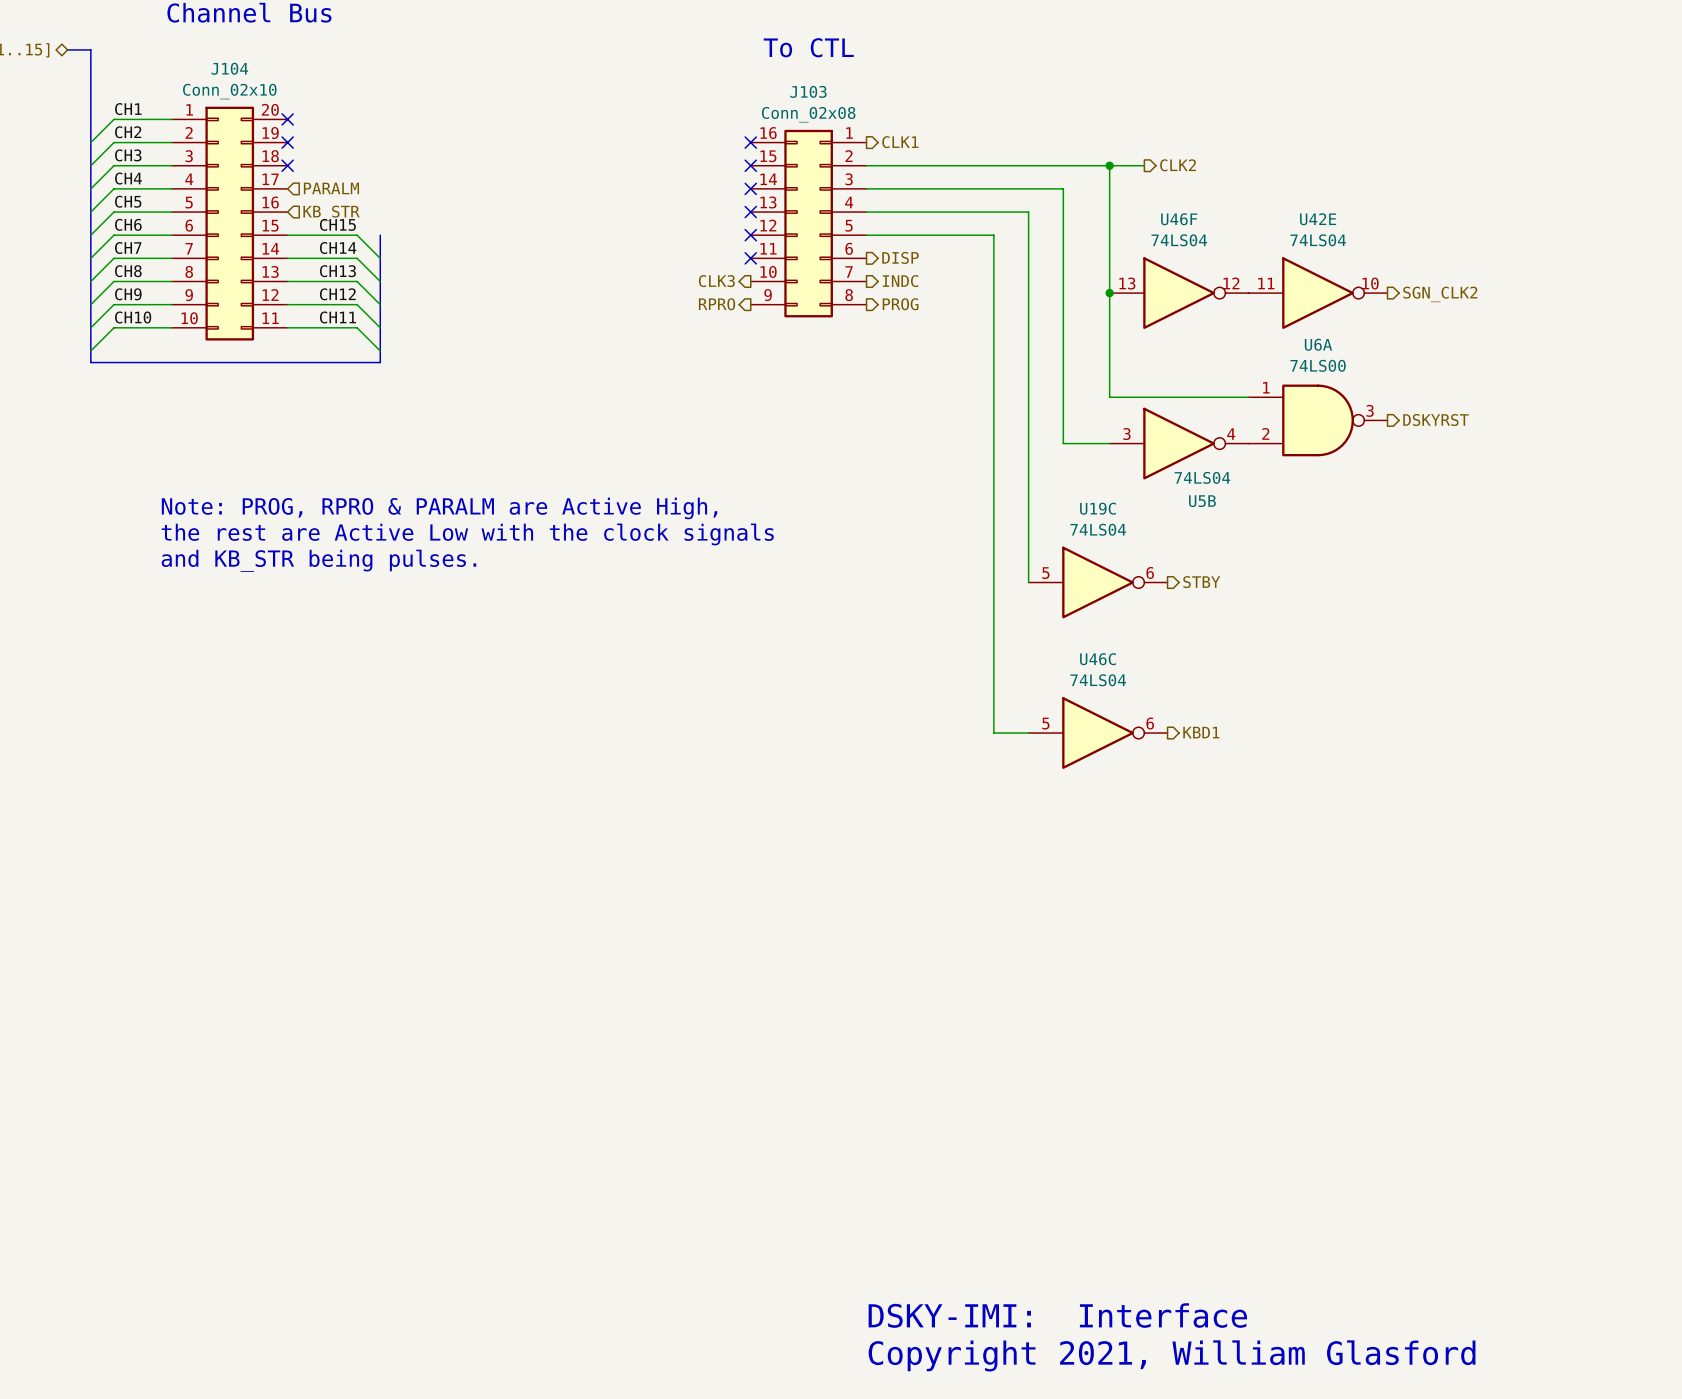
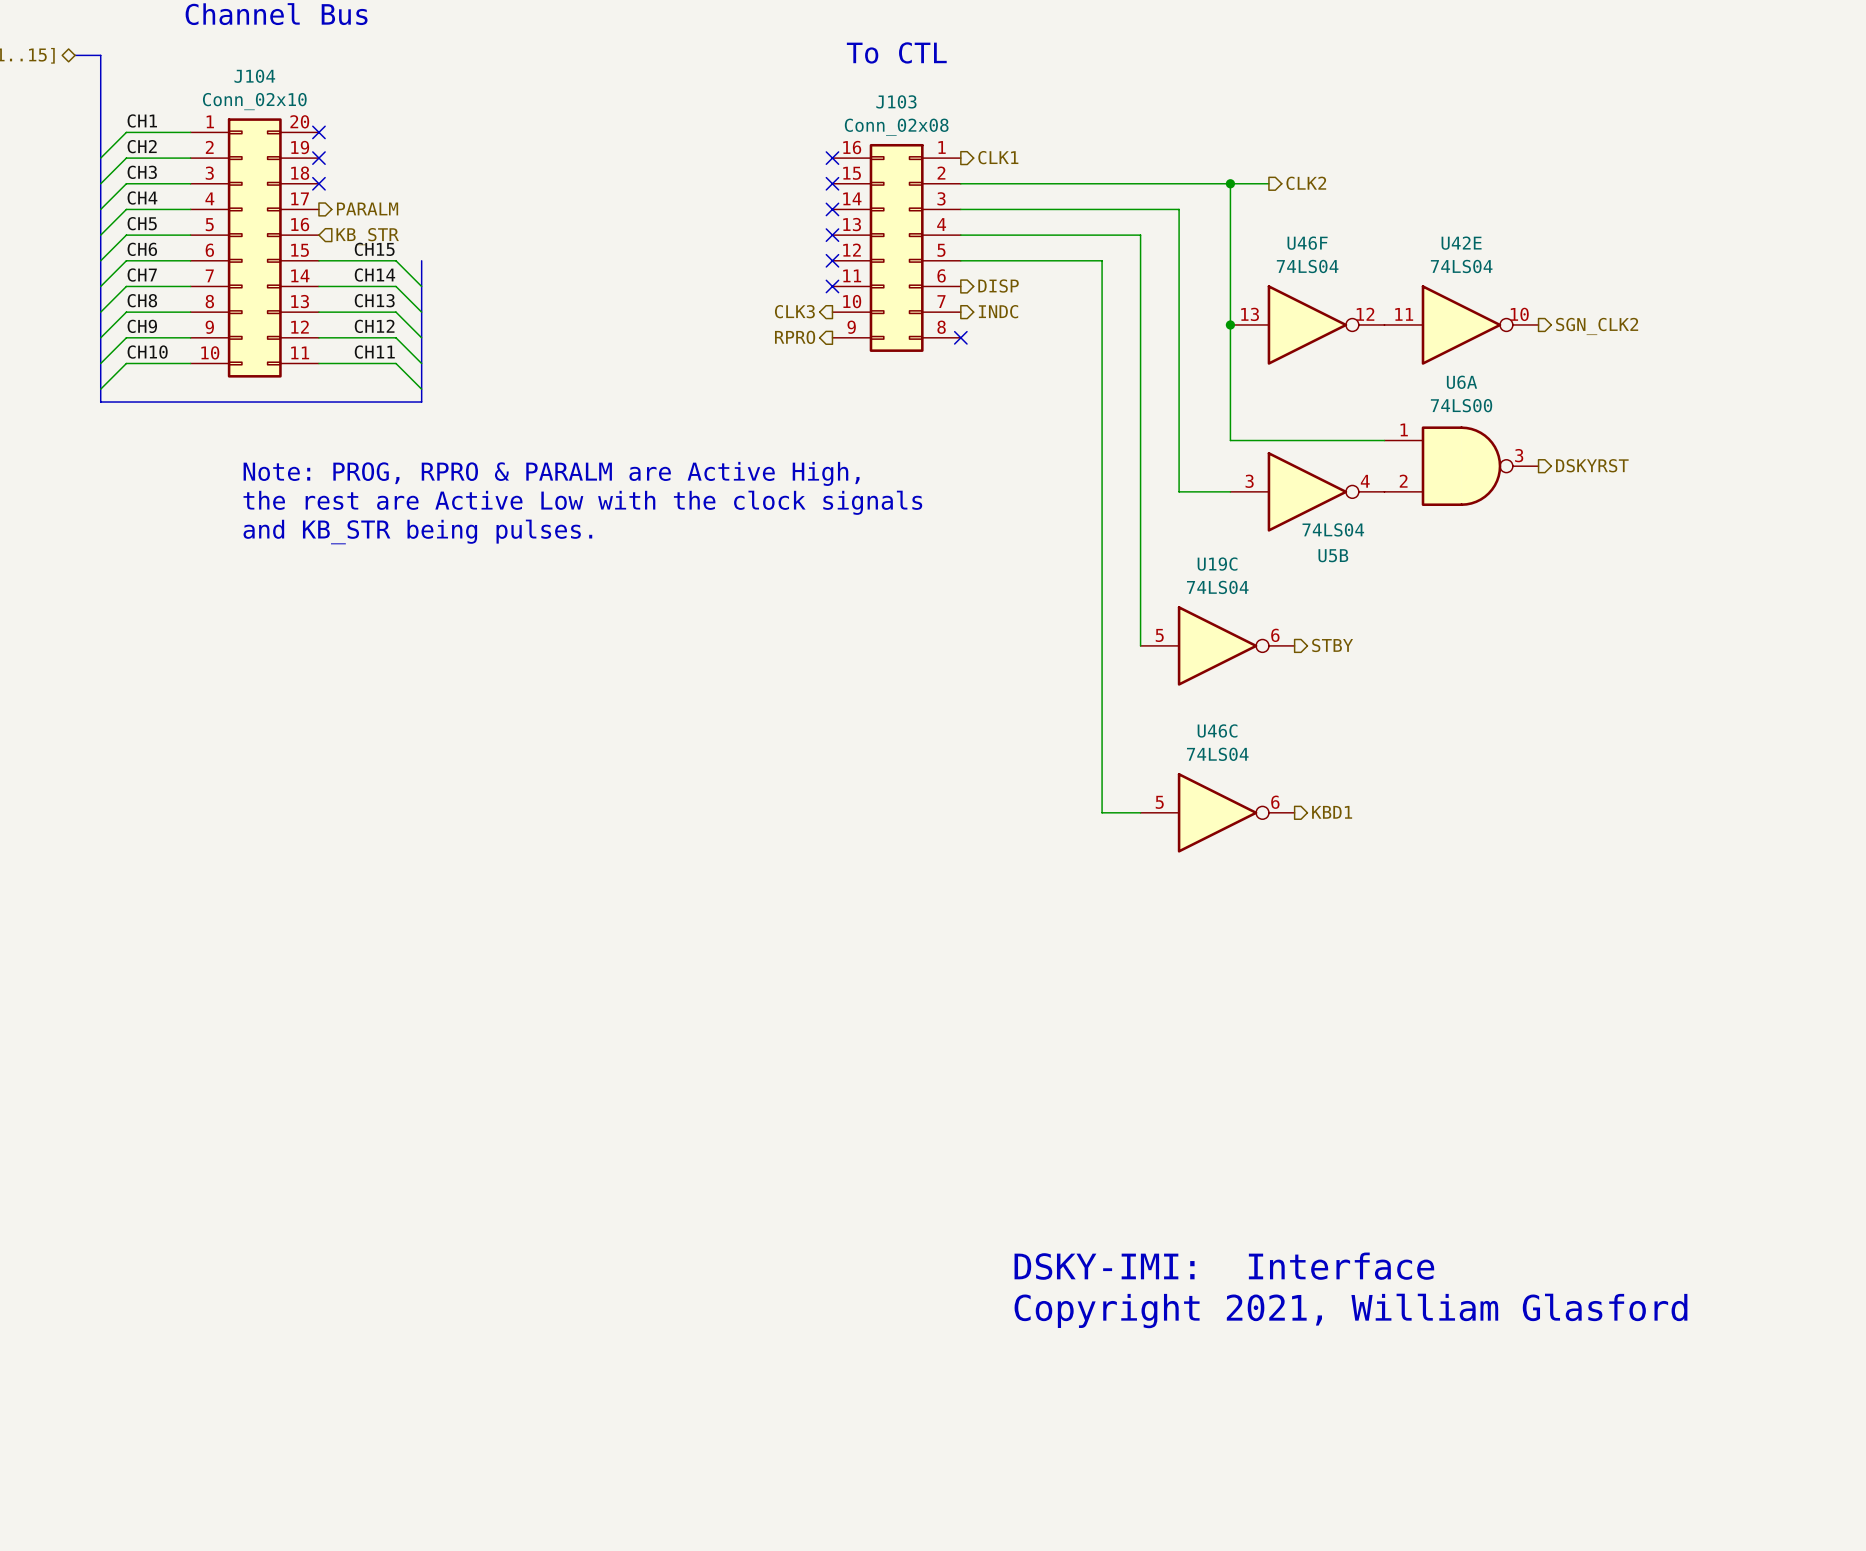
hierarchical label shape: input (331, 188) -> output (367, 208)
no-connect mark: none -> (960, 337)
hierarchical label: PROG (900, 304) -> none
text position: Note: PROG, RPRO & PARALM are Active High, (439, 508) -> Note: PROG, RPRO & PARALM are Active High, (551, 473)
text position: the rest are Active Low with the clock signals (467, 534) -> the rest are Active Low with the clock signals (582, 502)
text position: and KB_STR being pulses. (318, 560) -> and KB_STR being pulses. (417, 531)
text position: DSKY-IMI: Interface (1057, 1315) -> DSKY-IMI: Interface (1224, 1266)
text position: Copyright 2021, William Glasford (1172, 1355) -> Copyright 2021, William Glasford (1350, 1310)

